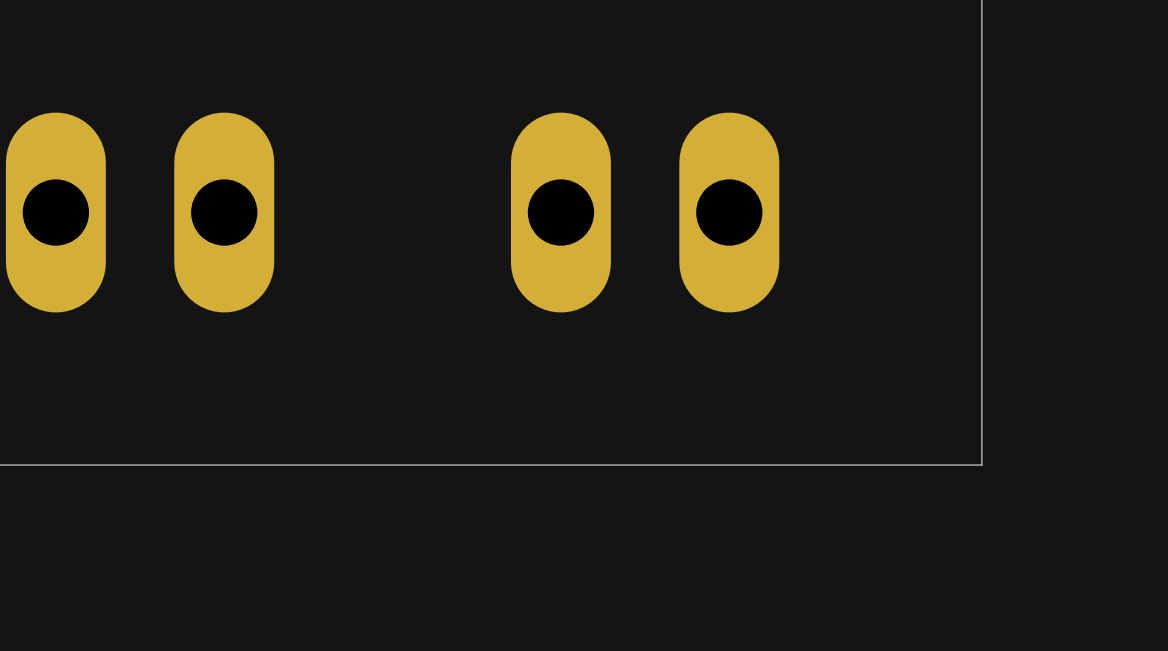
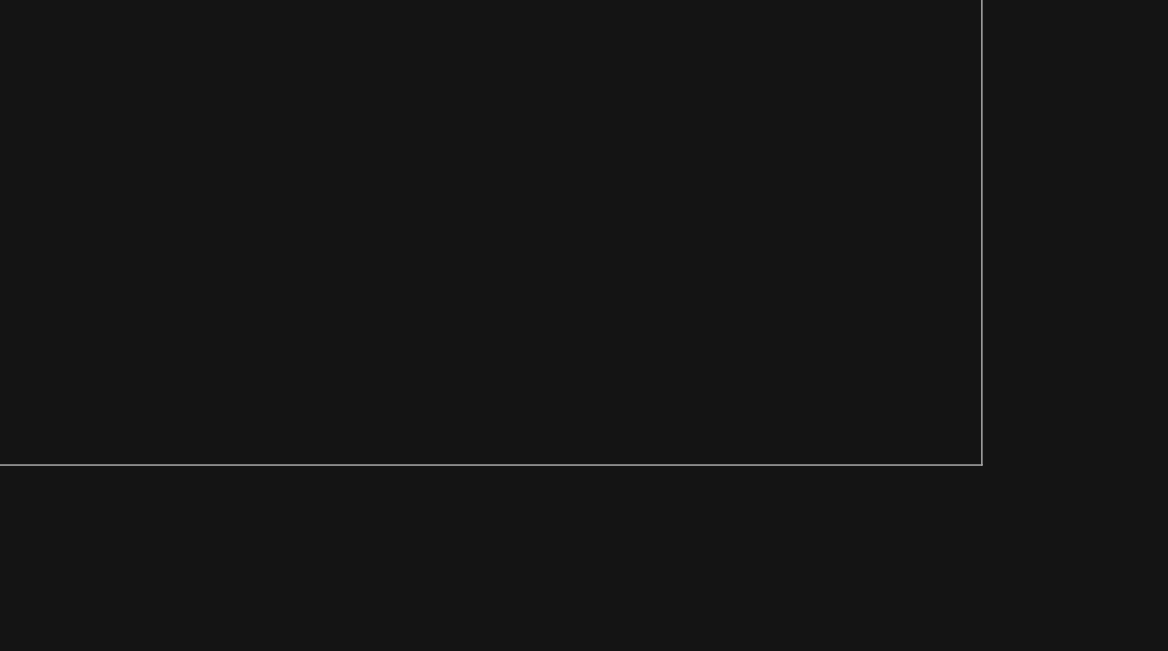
part: (140, 212) -> none
part: (645, 212) -> none

